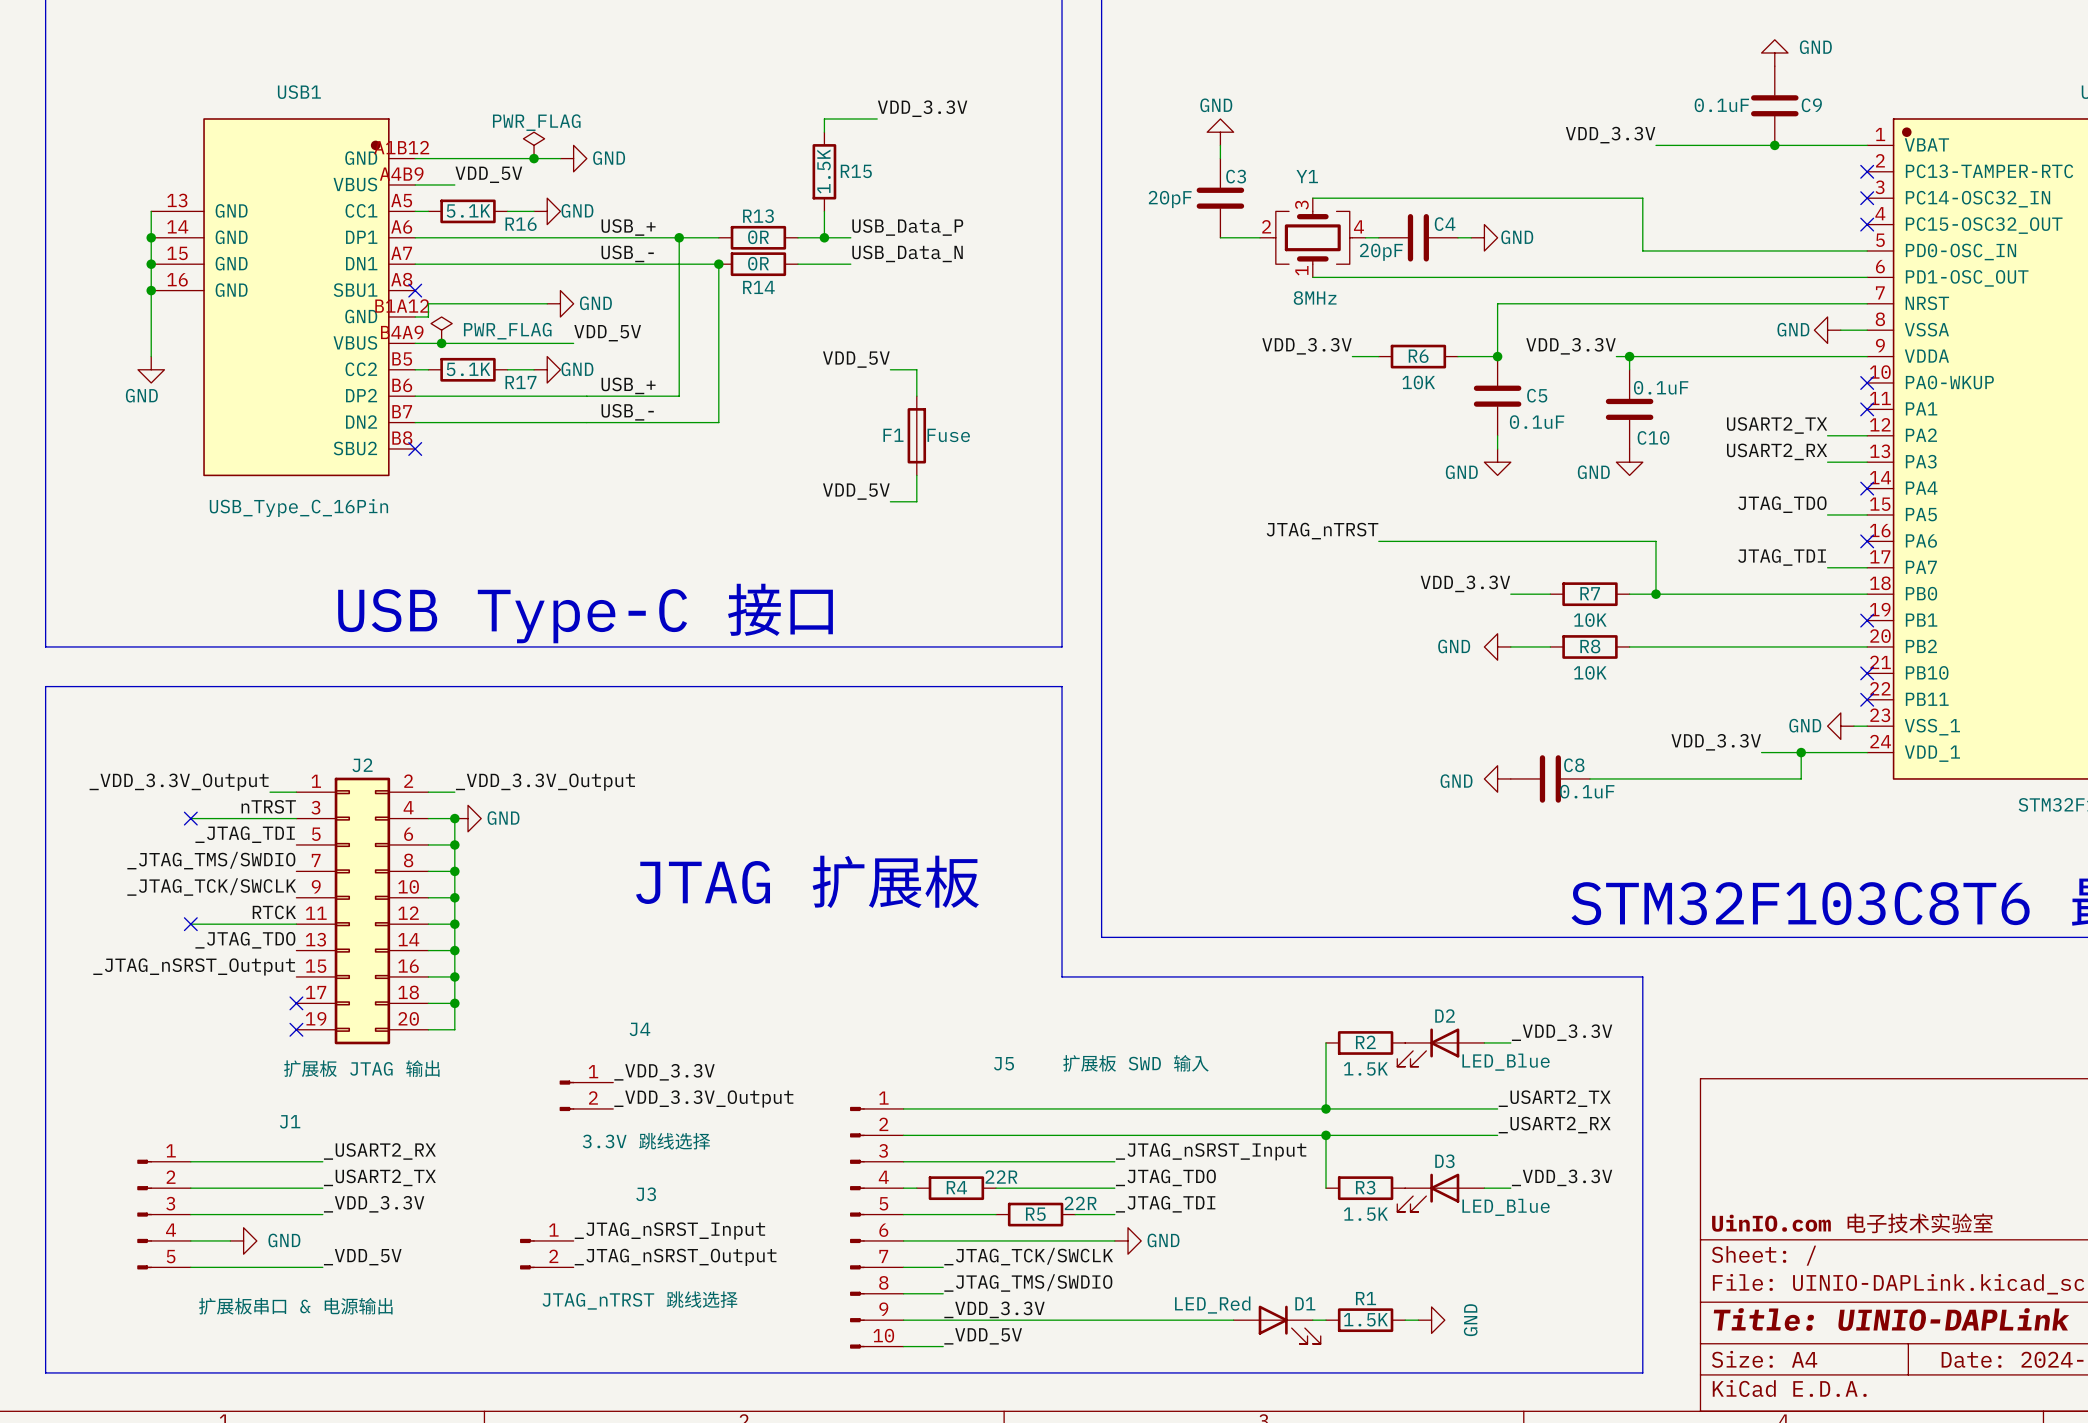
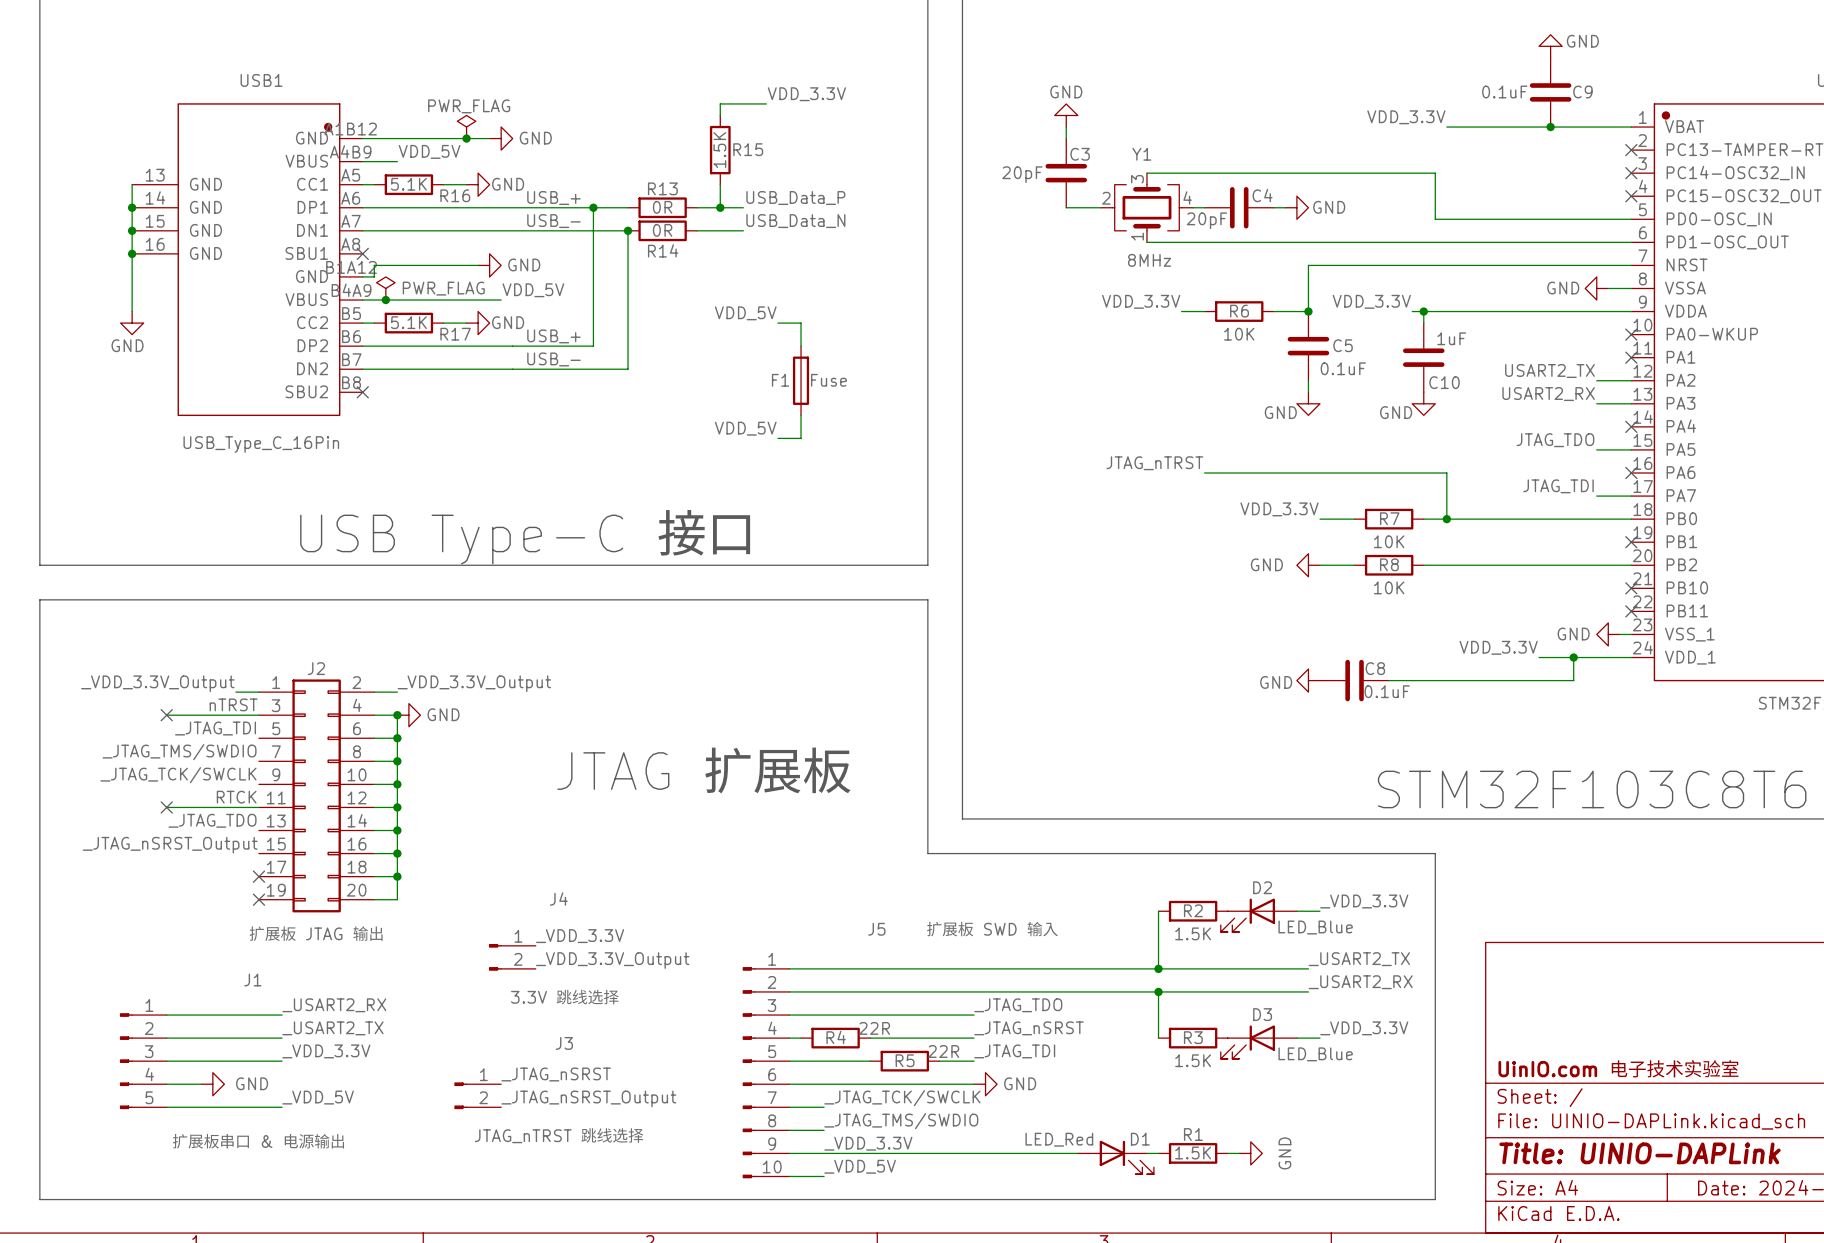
C10 value: 0.1uF (1661, 387) -> 1uF (1451, 338)
label: _JTAG_nSRST_Input (1211, 1151) -> _JTAG_TDO (1018, 1005)
label: _JTAG_TDO (1165, 1177) -> _JTAG_nSRST (1029, 1028)
label: _JTAG_nSRST_Input (669, 1230) -> _JTAG_nSRST (556, 1074)

